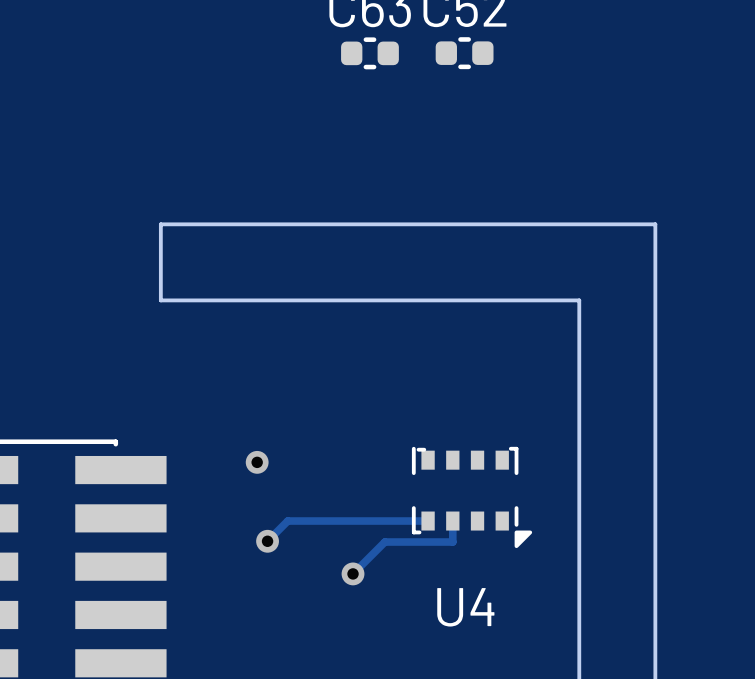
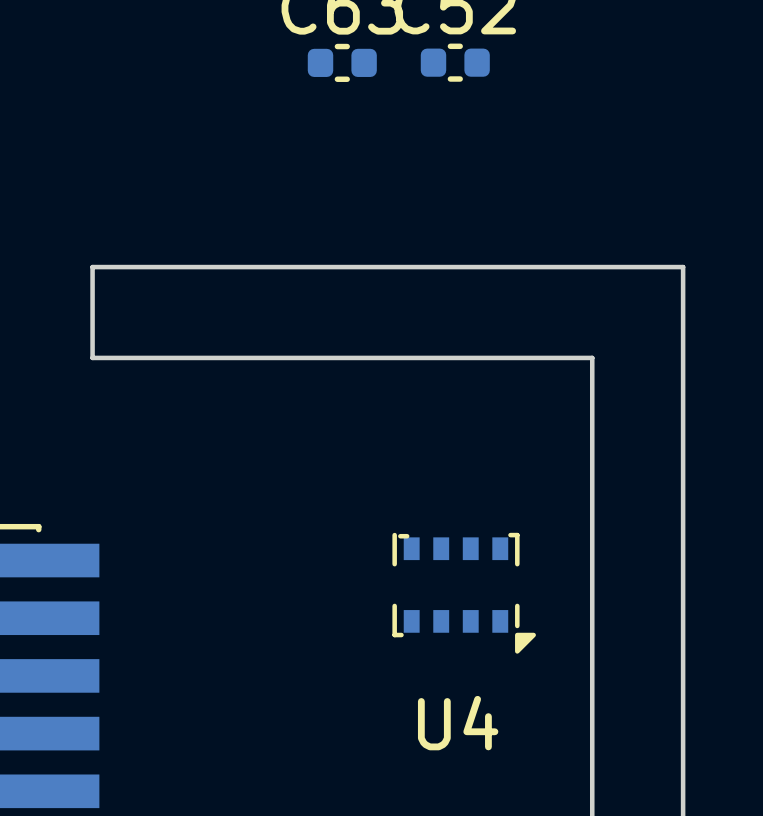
via: (257, 462) -> none
track: (428, 521) (287, 521) (267, 541) -> none
track: (452, 521) (452, 542) (384, 542) (353, 573) -> none
via: (267, 541) -> none
via: (353, 573) -> none

